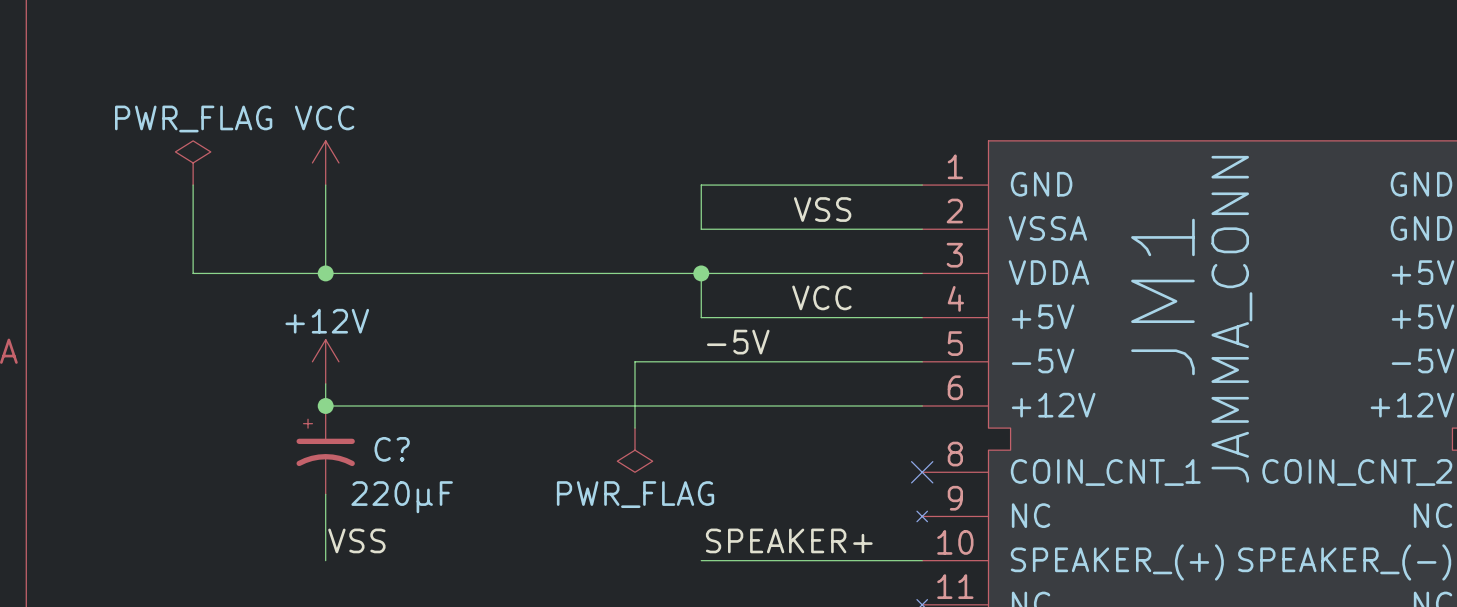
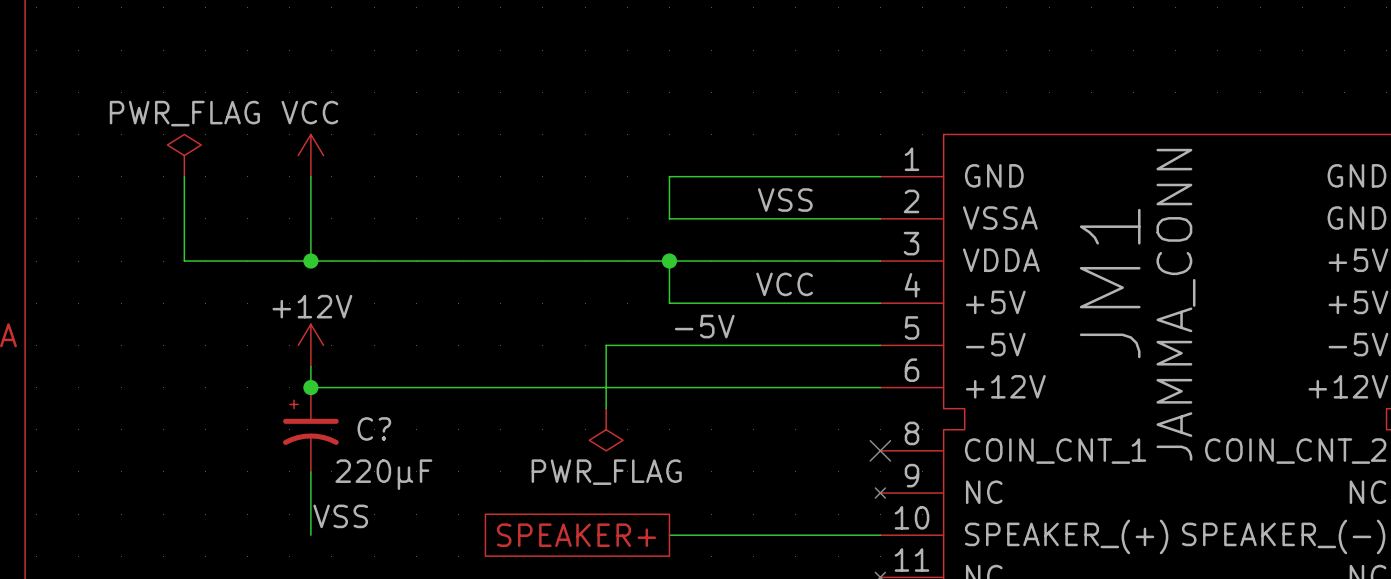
label: SPEAKER+ (789, 540) -> none
global label: none -> SPEAKER+ (576, 535)

